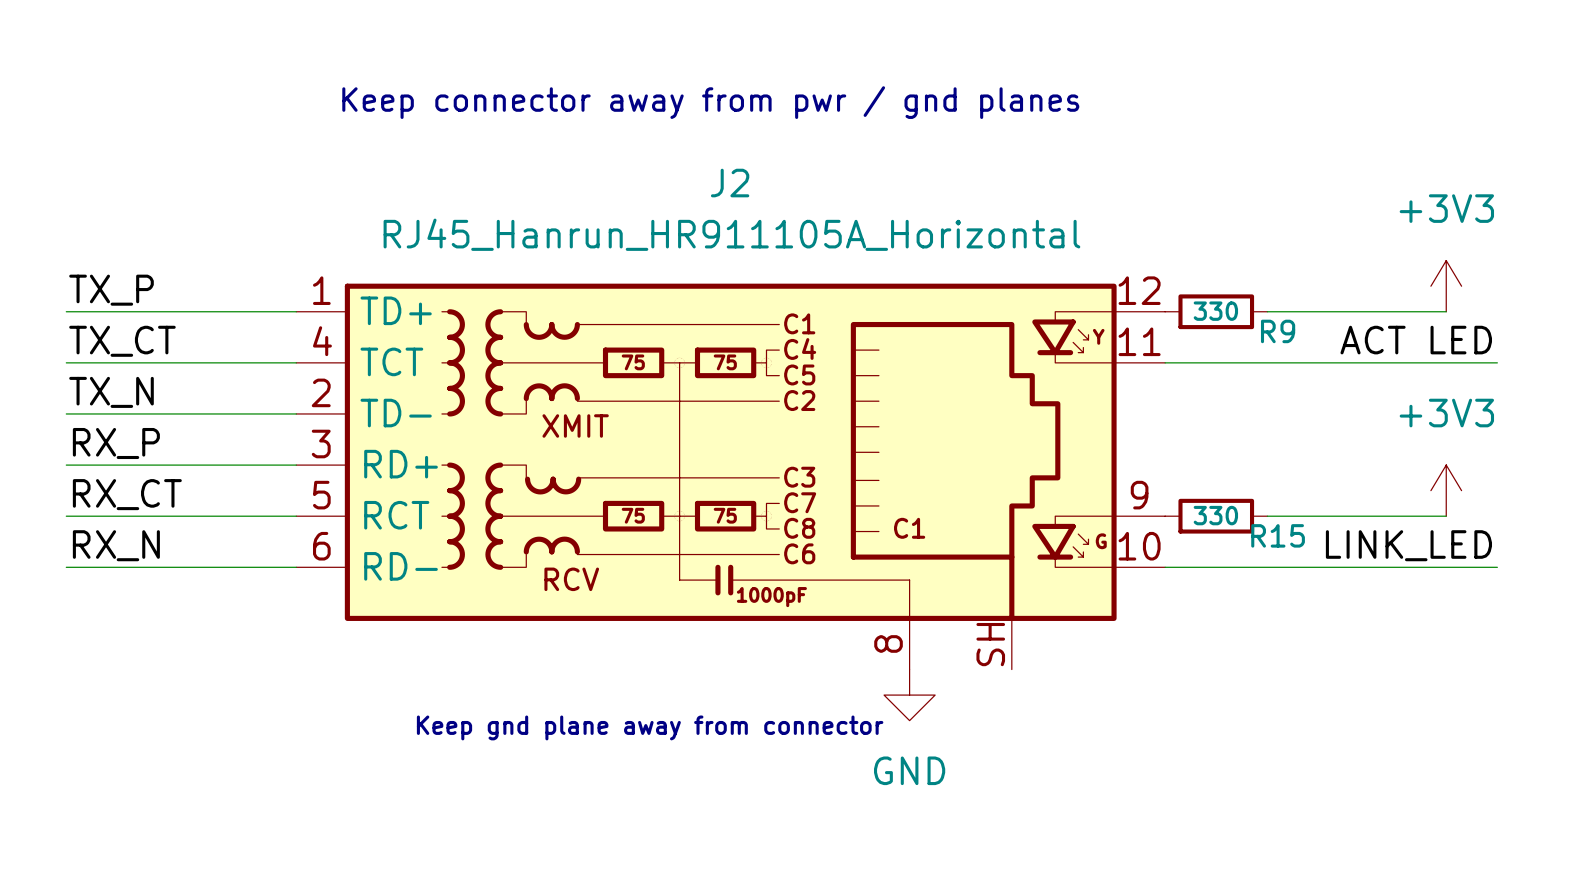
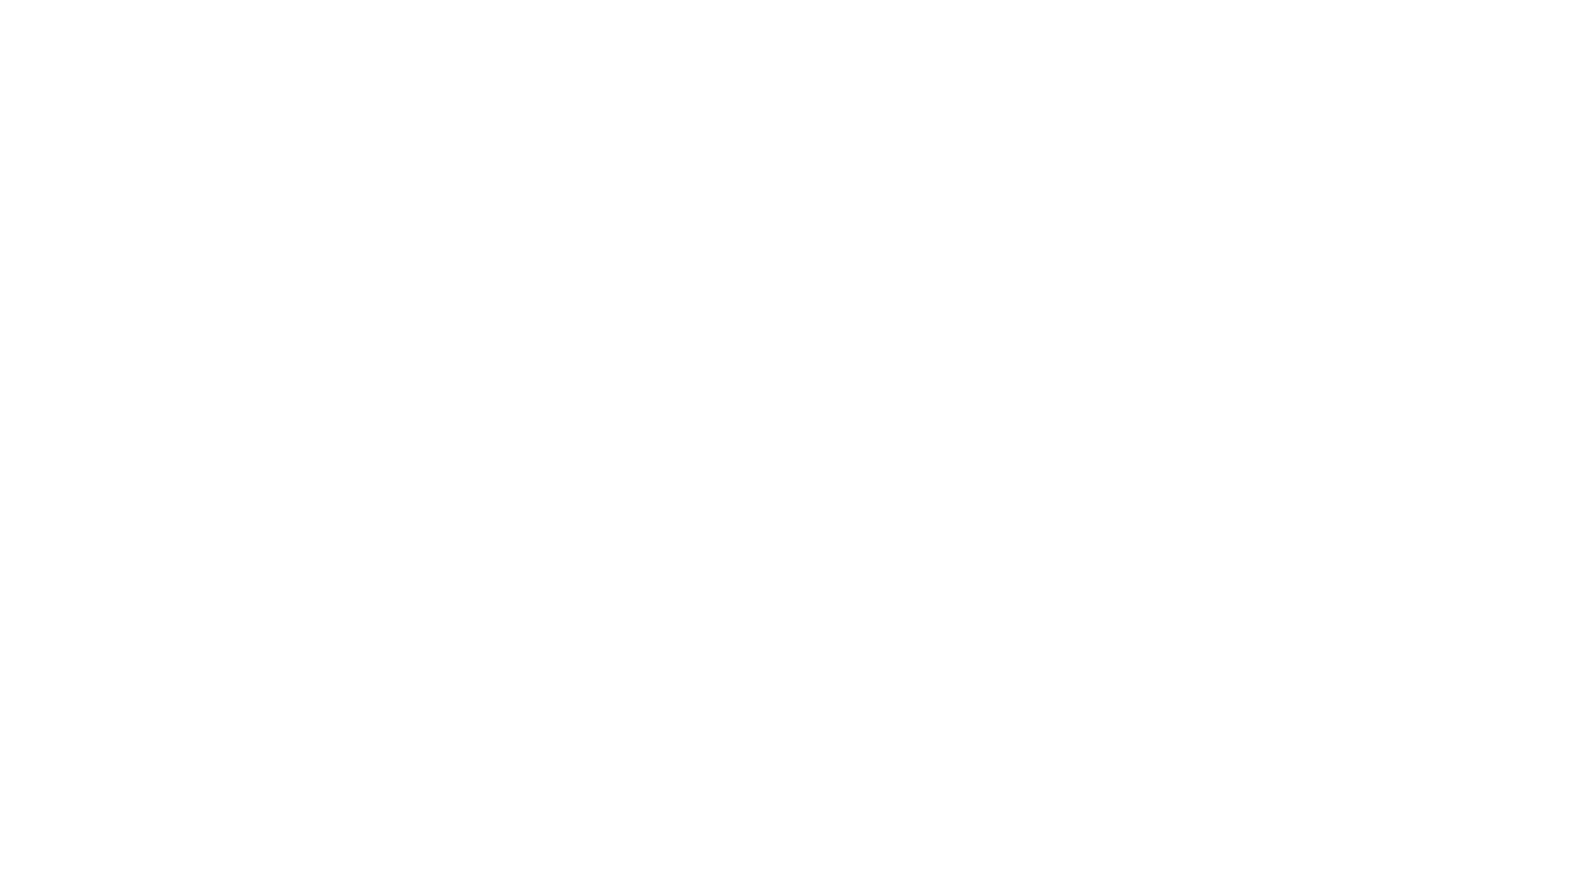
text: Keep connector away from pwr / gnd planes (710, 102) -> none
power symbol: +3V3 (1446, 286) -> none
label: TX_P (111, 290) -> none
wire: (66, 311) (296, 311) -> none
R9: 330 (1216, 311) -> none
wire: (1267, 311) (1446, 311) -> none
label: ACT LED (1416, 340) -> none
label: TX_CT (122, 341) -> none
wire: (66, 362) (296, 362) -> none
wire: (1165, 362) (1497, 362) -> none
label: TX_N (111, 392) -> none
wire: (66, 413) (296, 413) -> none
label: RX_P (116, 443) -> none
wire: (66, 465) (296, 465) -> none
J2: RJ45_Hanrun_HR911105A_Horizontal (730, 476) -> none
power symbol: +3V3 (1446, 490) -> none
label: RX_CT (127, 494) -> none
wire: (66, 516) (296, 516) -> none
R15: 330 (1216, 516) -> none
wire: (1267, 516) (1446, 516) -> none
label: RX_N (116, 545) -> none
label: LINK_LED (1408, 545) -> none
wire: (66, 567) (296, 567) -> none
wire: (1165, 567) (1497, 567) -> none
power symbol: GND (909, 695) -> none
text: Keep gnd plane away from connector (650, 727) -> none

